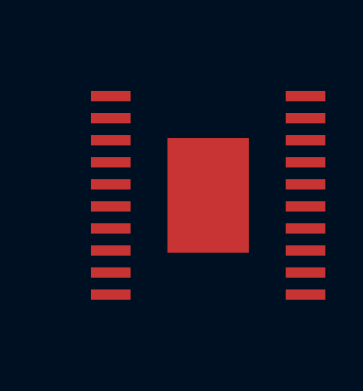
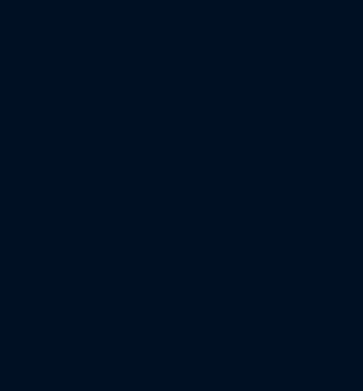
part: (208, 195) -> none

